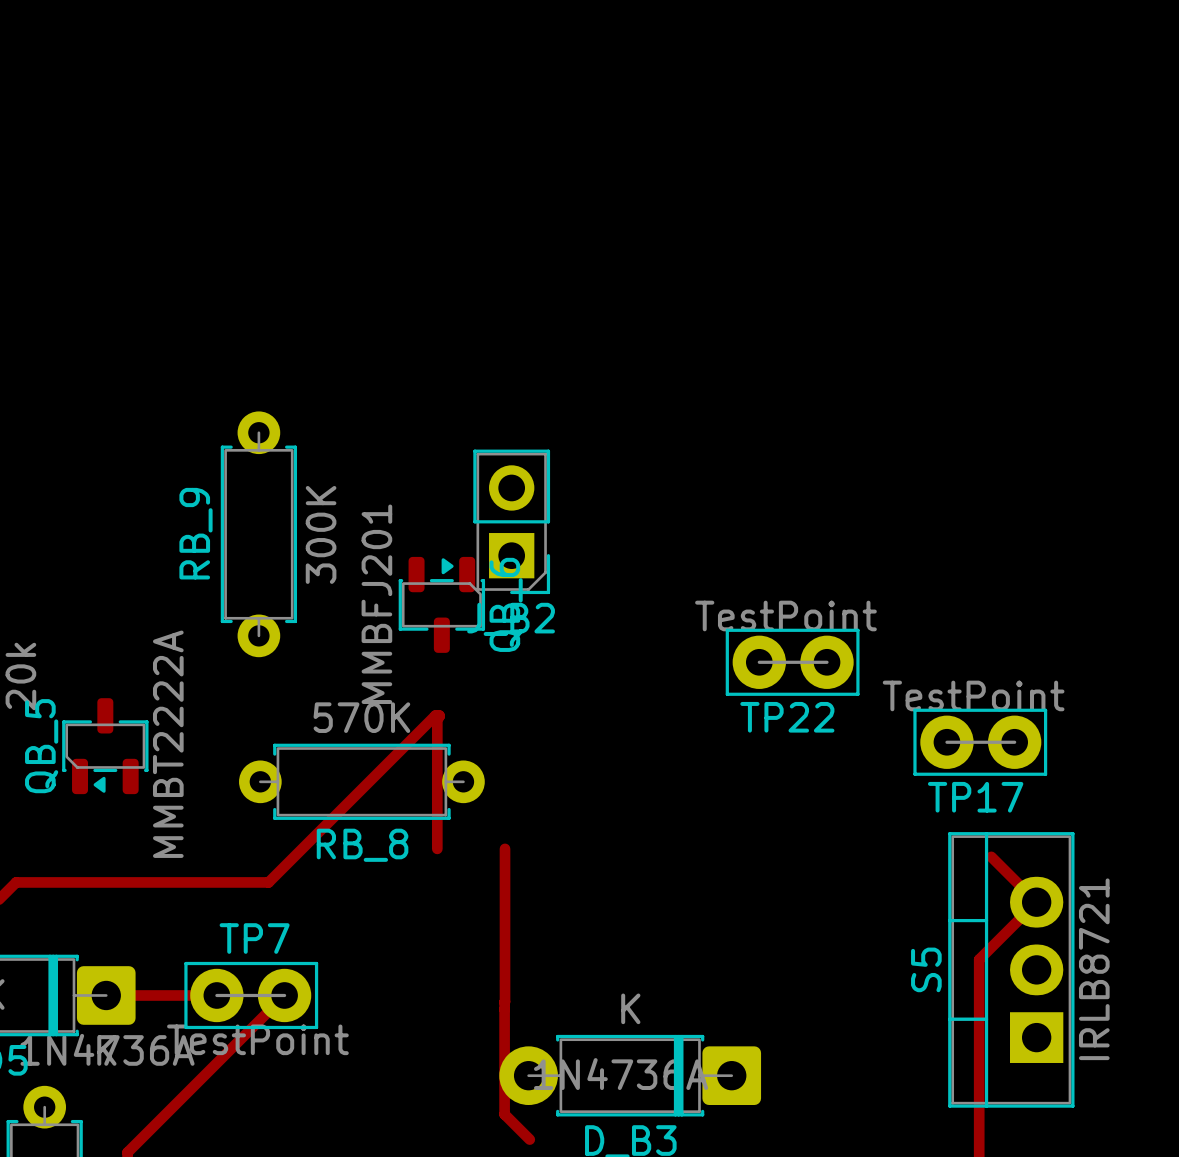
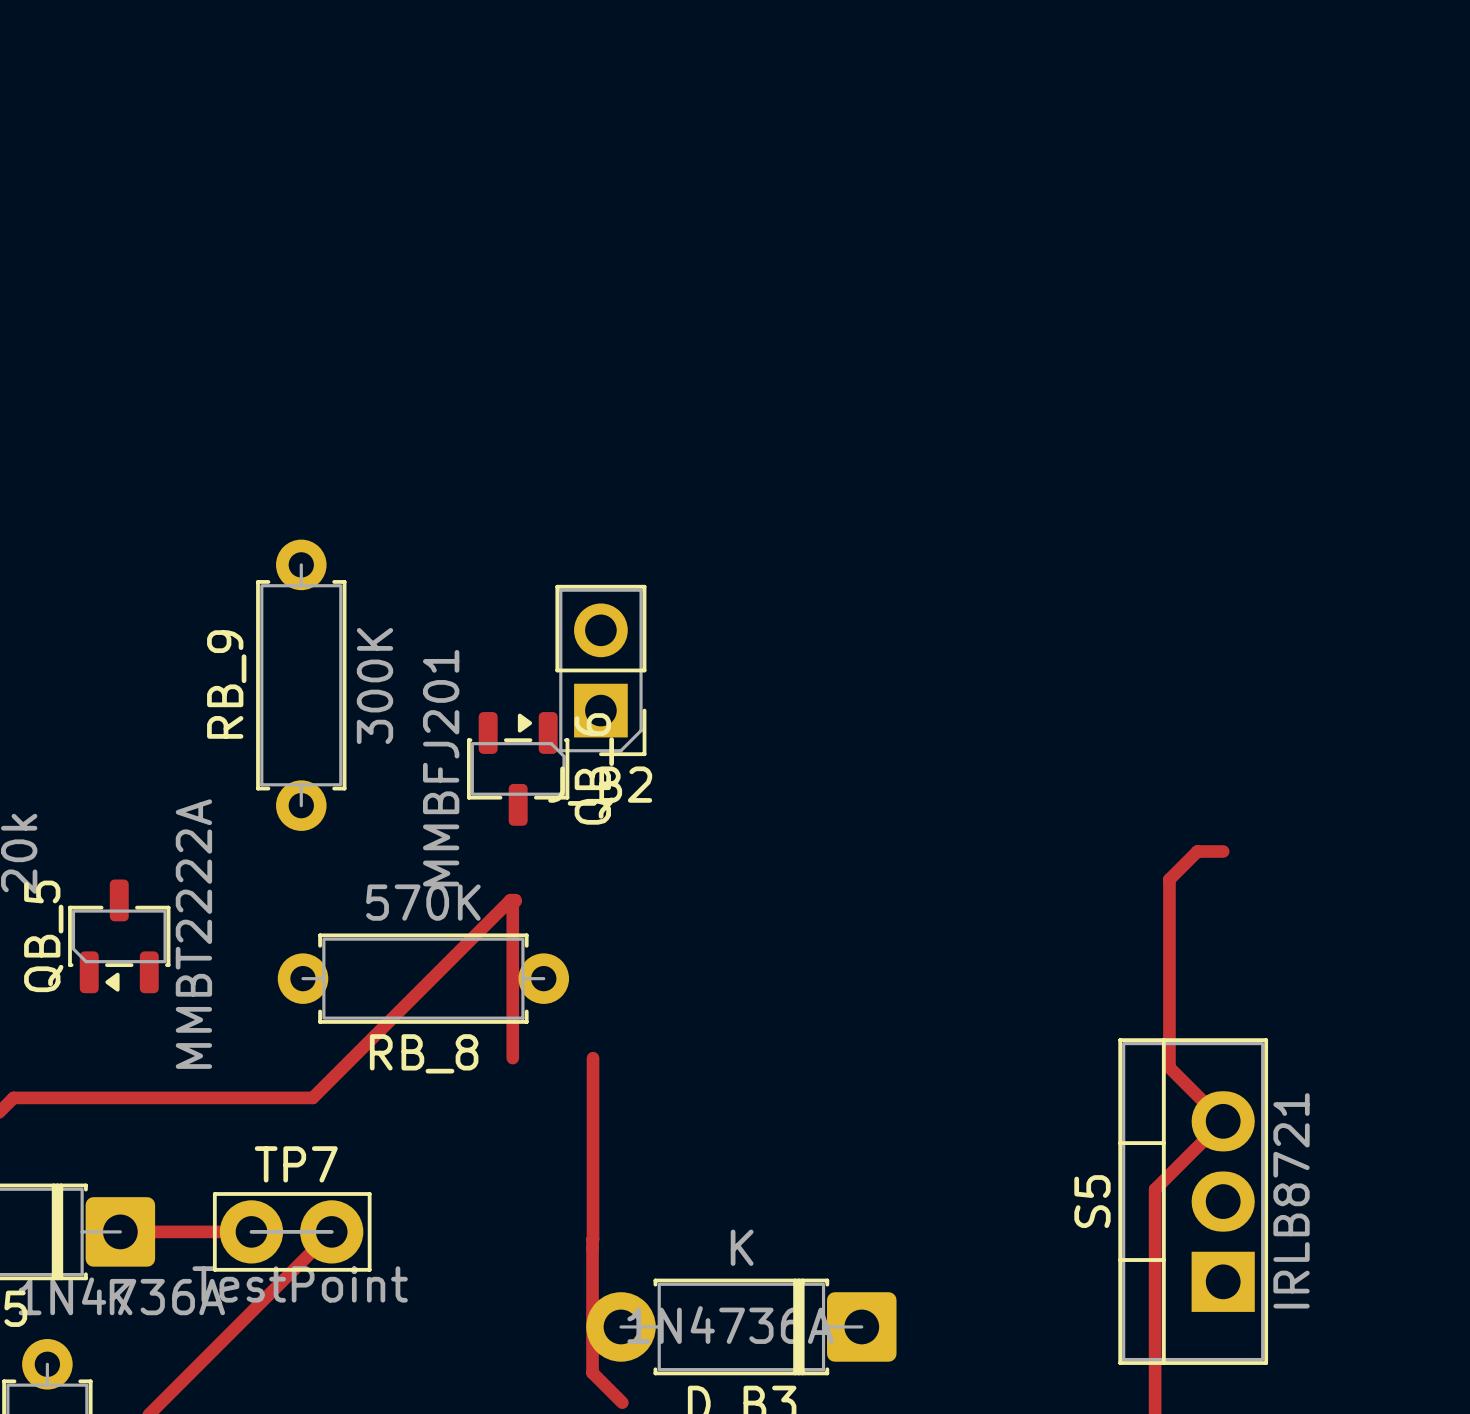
TP22: TestPoint (792, 662) -> none
track: none -> (1223, 851) (1197, 851) (1169, 879) (1169, 1067)
TP17: TestPoint (980, 742) -> none

